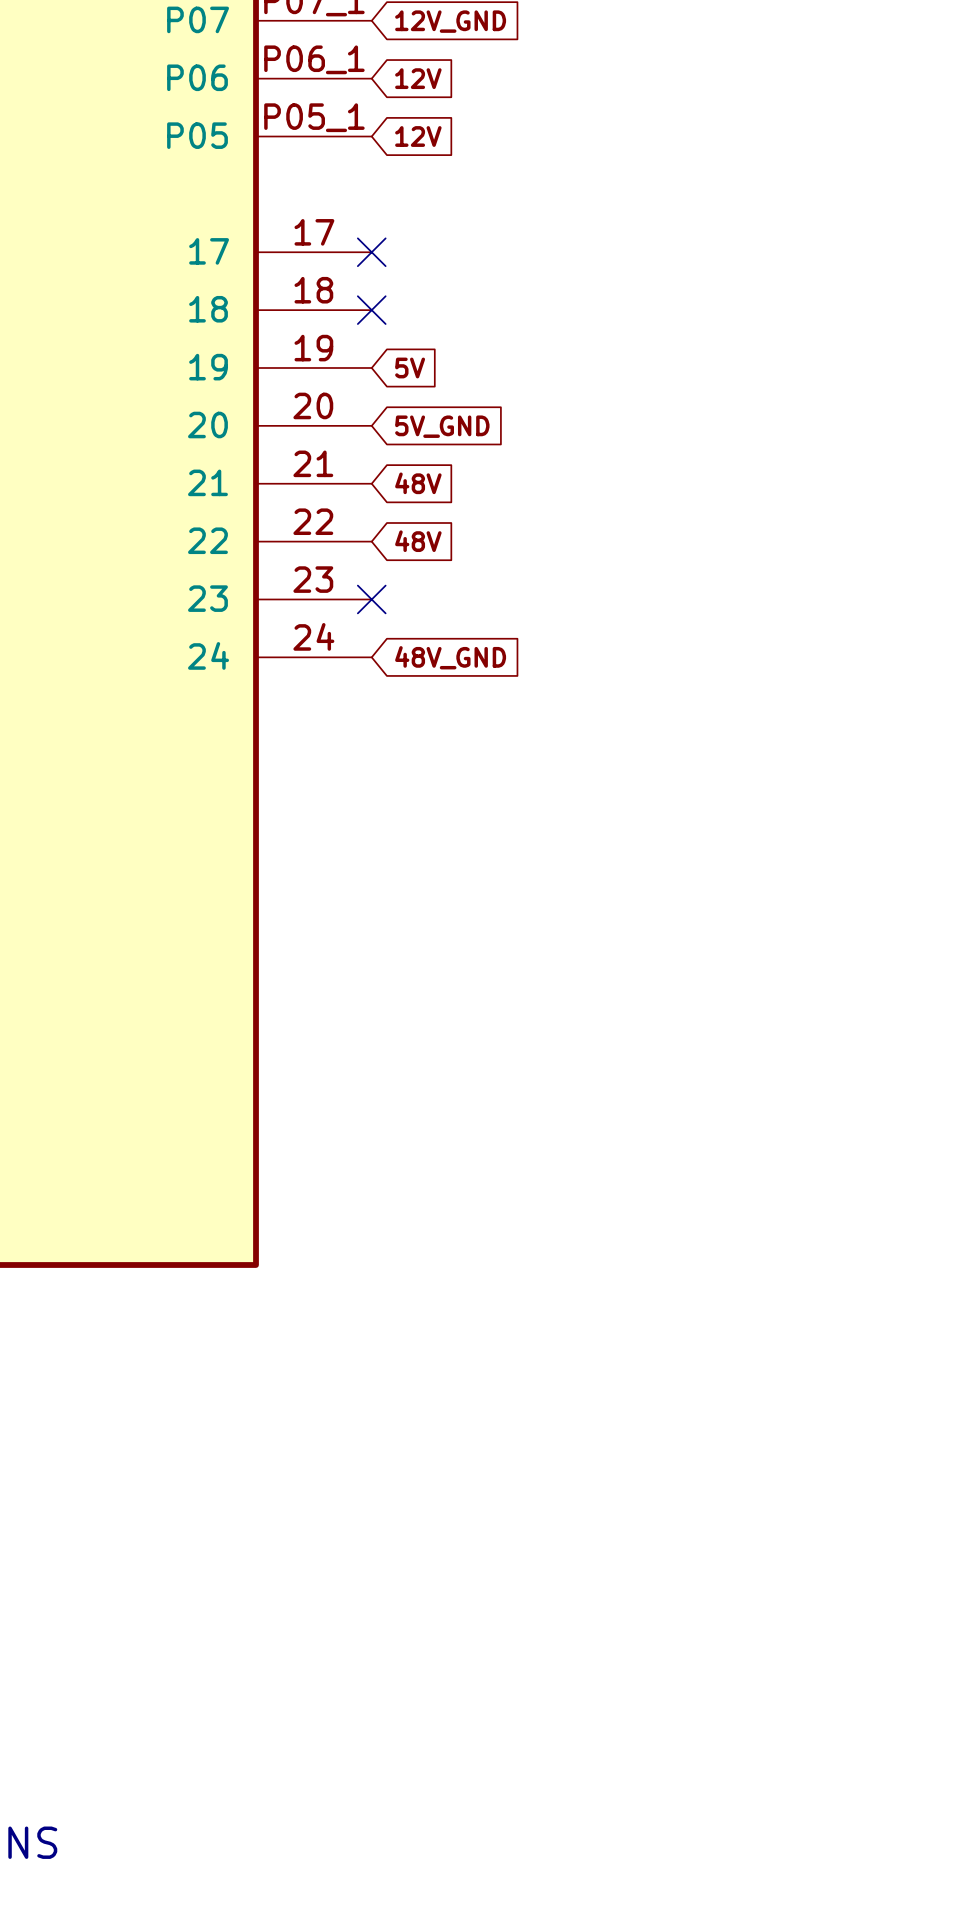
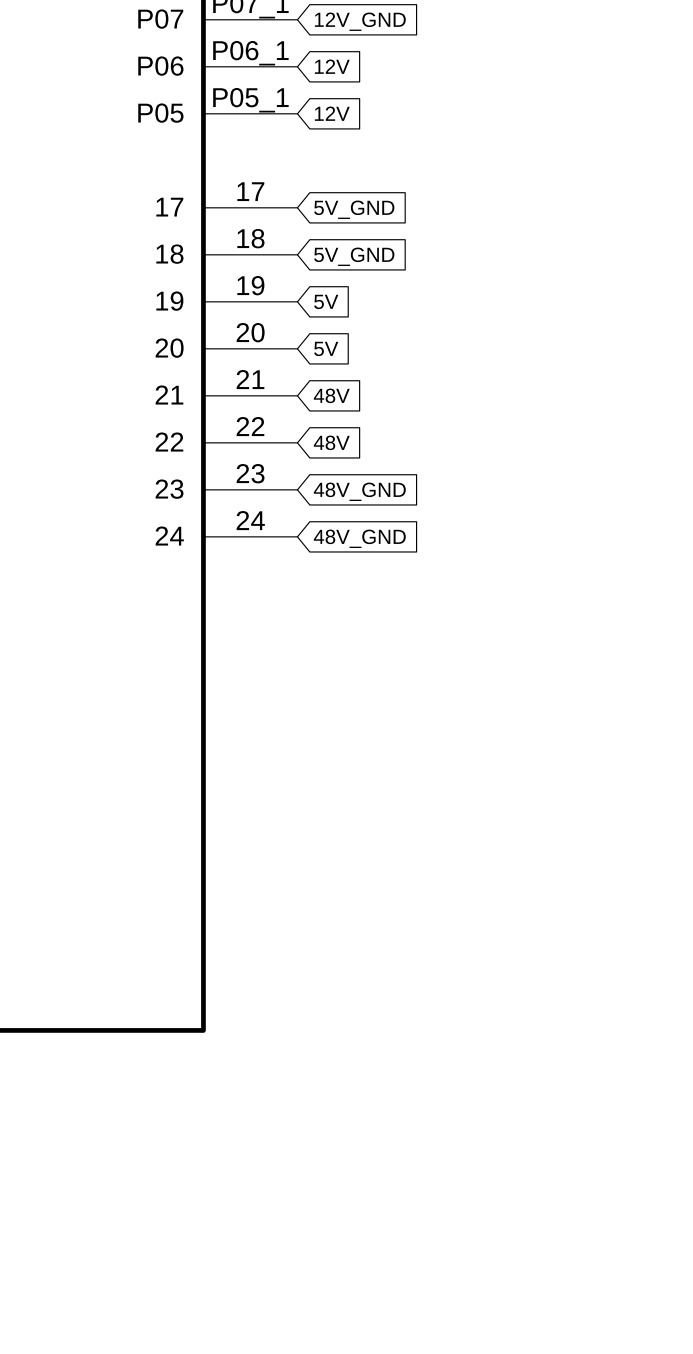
no-connect mark: (371, 252) -> none
global label: none -> 5V_GND (354, 209)
no-connect mark: (371, 310) -> none
global label: none -> 5V_GND (354, 256)
global label: 5V_GND (442, 426) -> 5V (326, 348)
no-connect mark: (371, 599) -> none
global label: none -> 48V_GND (359, 491)

